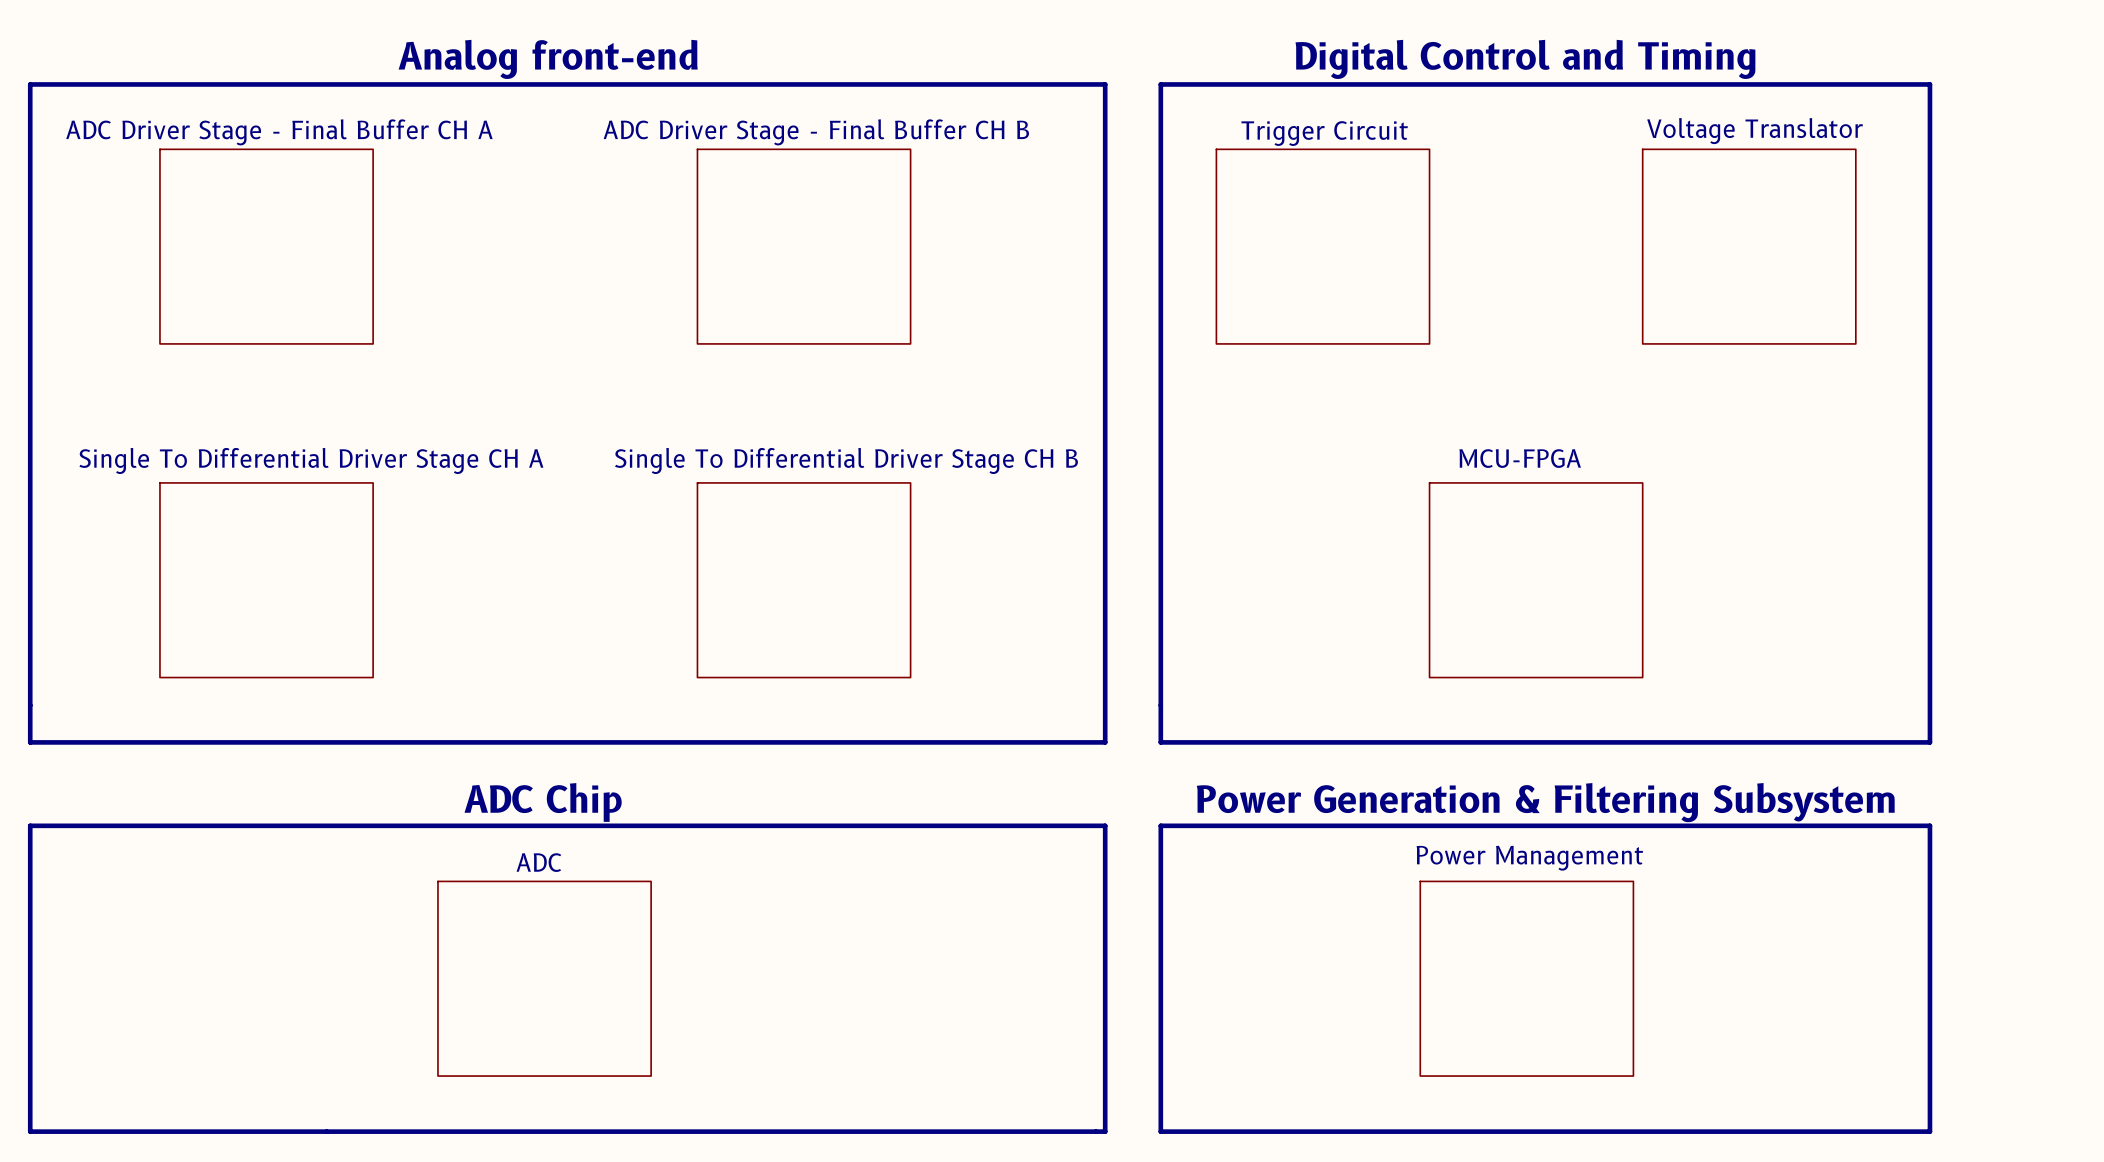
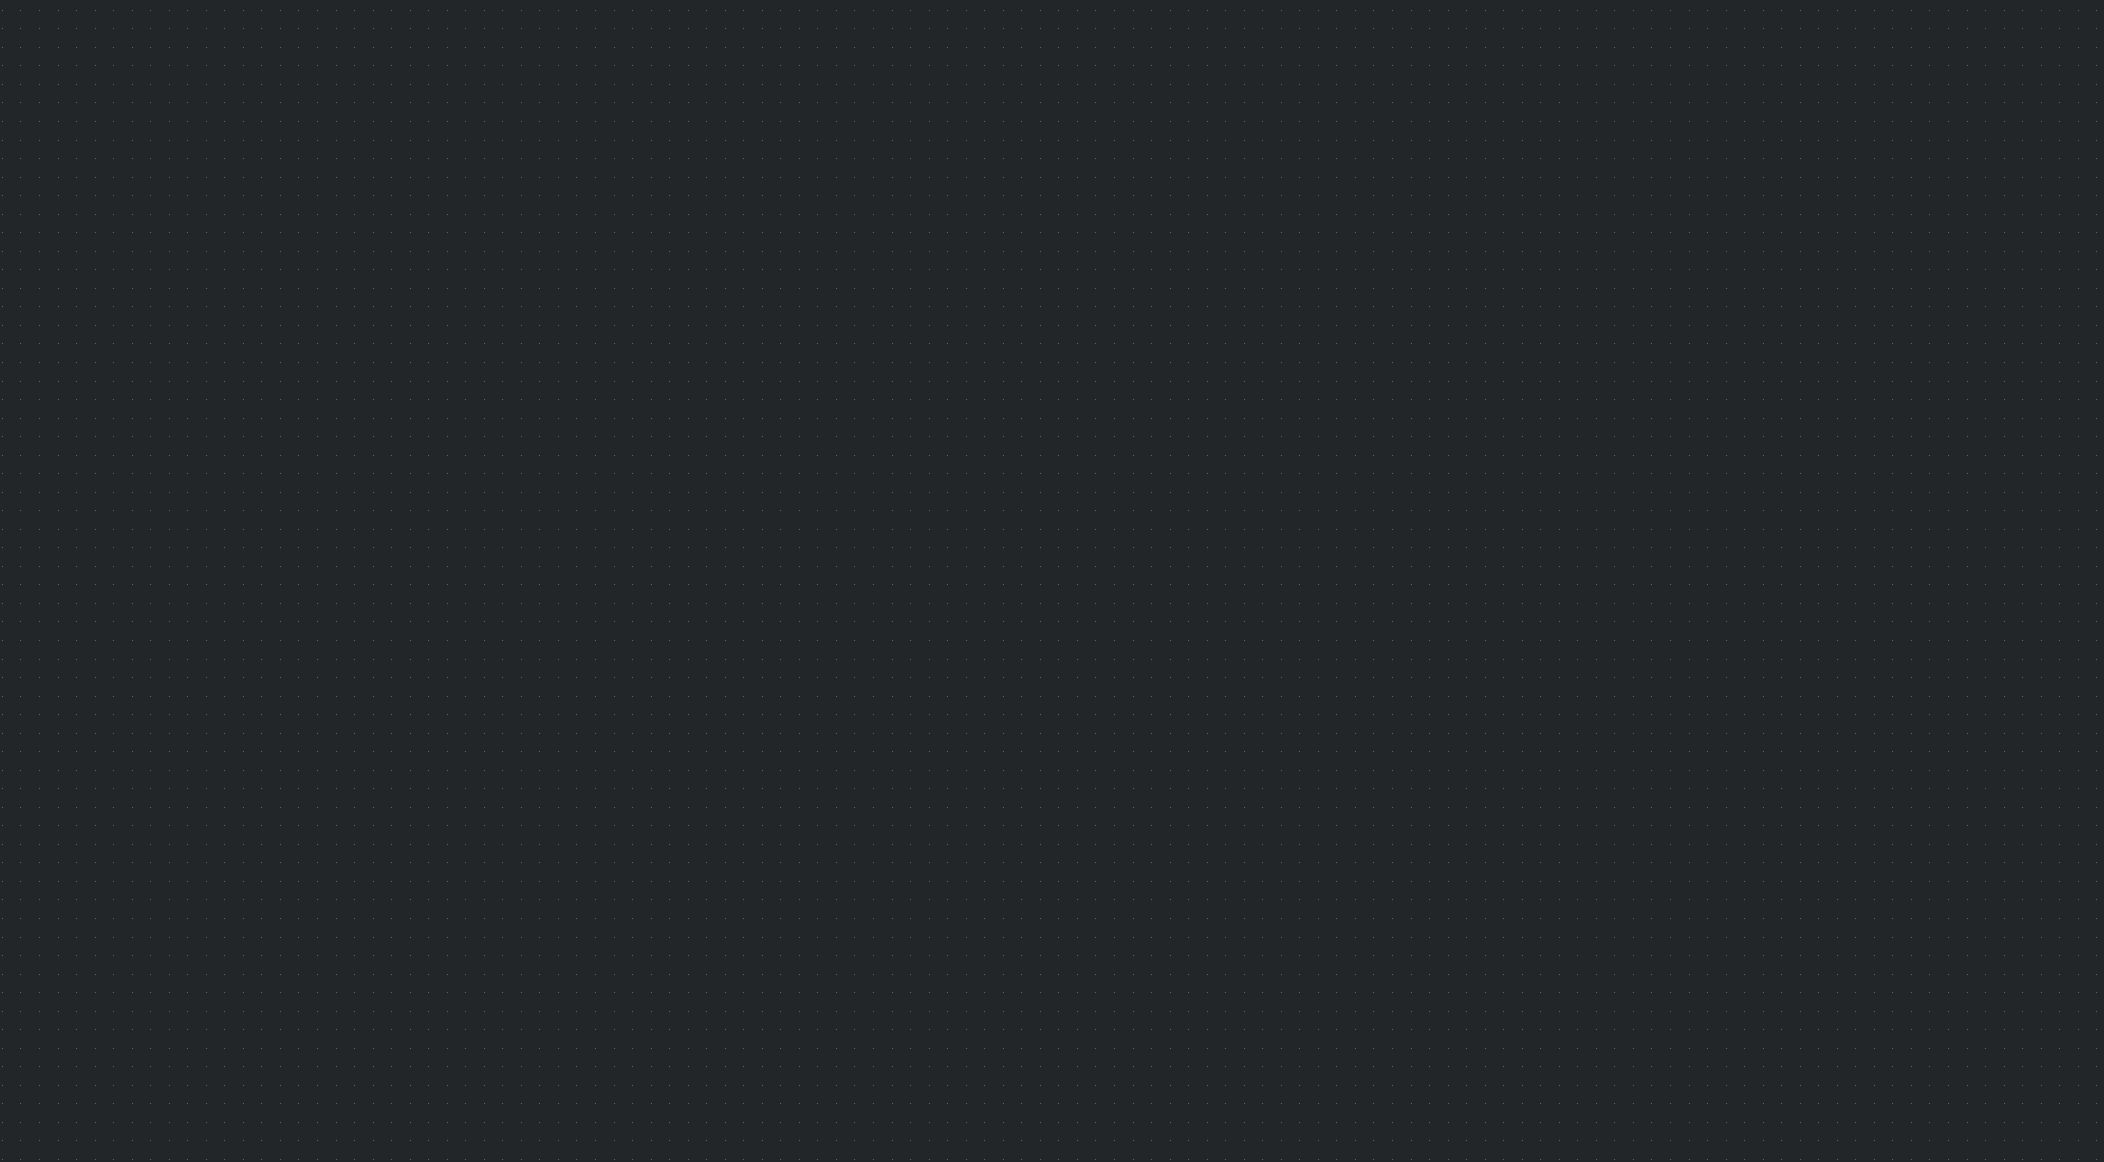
text: Analog front-end (548, 59) -> none
text: Digital Control and Timing (1525, 59) -> none
line: (30, 84) (30, 742) (1105, 742) (1105, 84) (30, 84) -> none
line: (1160, 84) (1160, 742) (1929, 742) (1929, 84) (1160, 84) -> none
sheet ADC Driver Stage - Final Buffer CH A: (266, 246) -> none
sheet ADC Driver Stage - Final Buffer CH B: (804, 246) -> none
sheet Trigger Circuit: (1322, 246) -> none
sheet Voltage Translator: (1749, 246) -> none
sheet Single To Differential Driver Stage CH A: (266, 580) -> none
sheet Single To Differential Driver Stage CH B: (804, 580) -> none
sheet MCU-FPGA: (1536, 580) -> none
text: ADC Chip (543, 802) -> none
text: Power Generation & Filtering Subsystem (1545, 802) -> none
line: (30, 825) (1105, 825) (1105, 1131) (30, 1131) (30, 825) -> none
line: (1160, 825) (1929, 825) (1929, 1131) (1160, 1131) (1160, 825) -> none
sheet ADC: (544, 978) -> none
sheet Power Management: (1526, 978) -> none

